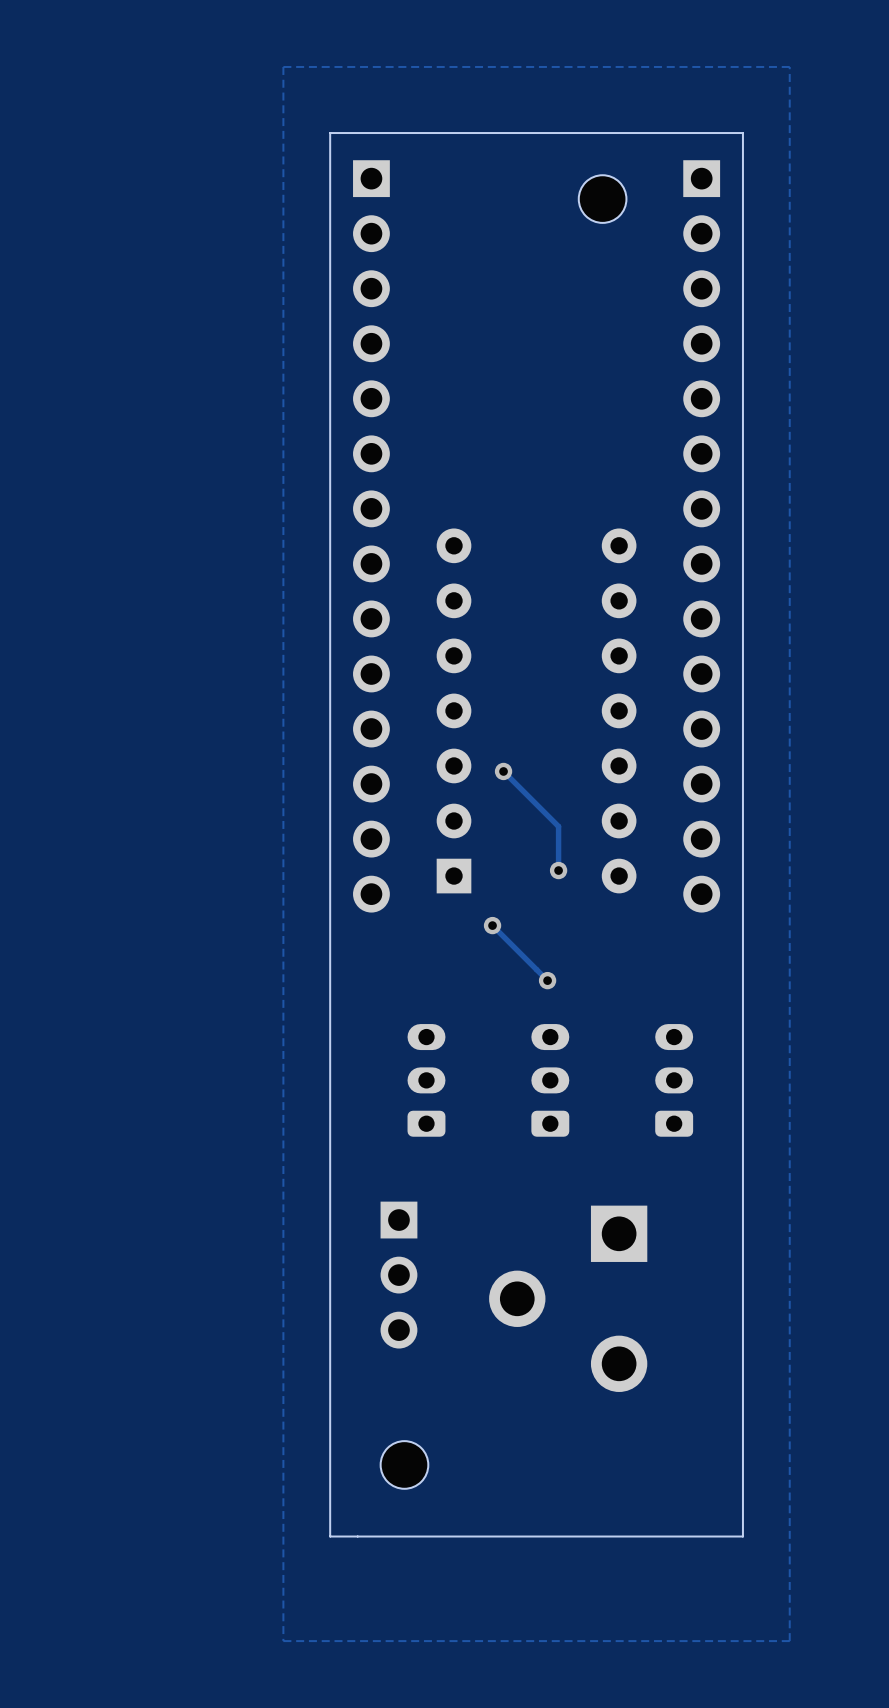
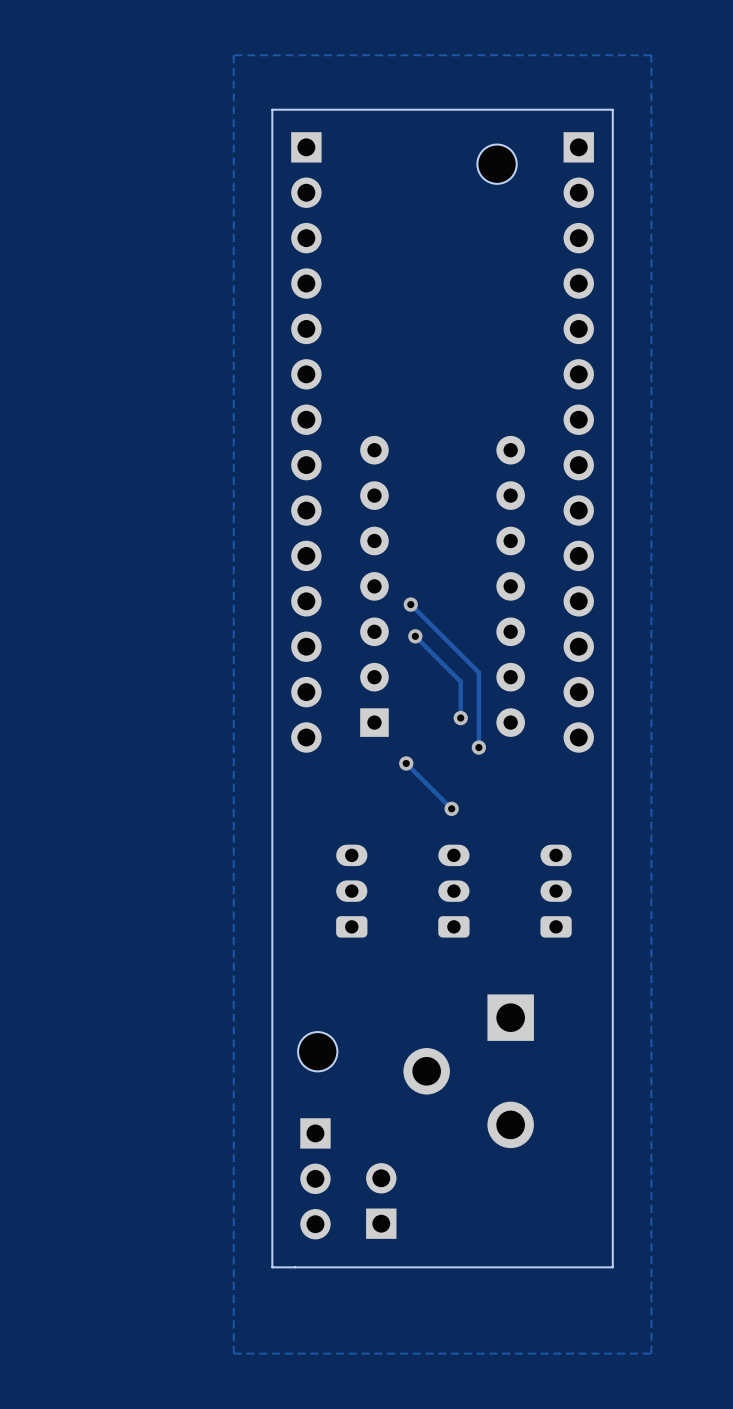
track: none -> (410, 604) (478, 672) (478, 747)
via: none -> (410, 604)
via: none -> (478, 747)
part footprint: [380, 1201, 418, 1349] -> [298, 1032, 338, 1072]
part: none -> (315, 1178)
part: none -> (381, 1200)
part: (404, 1464) -> none

